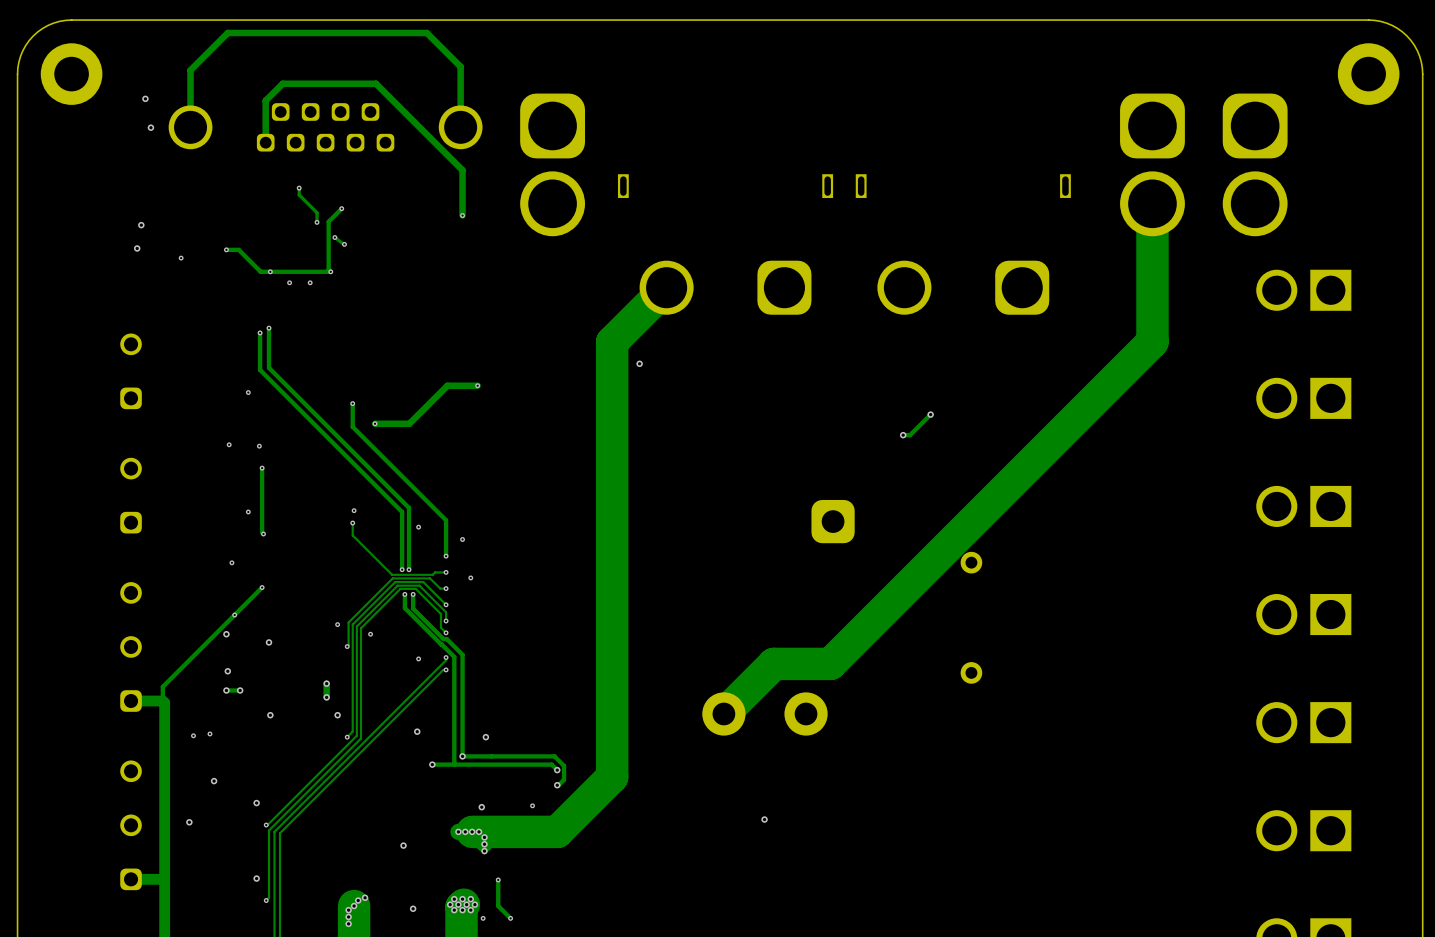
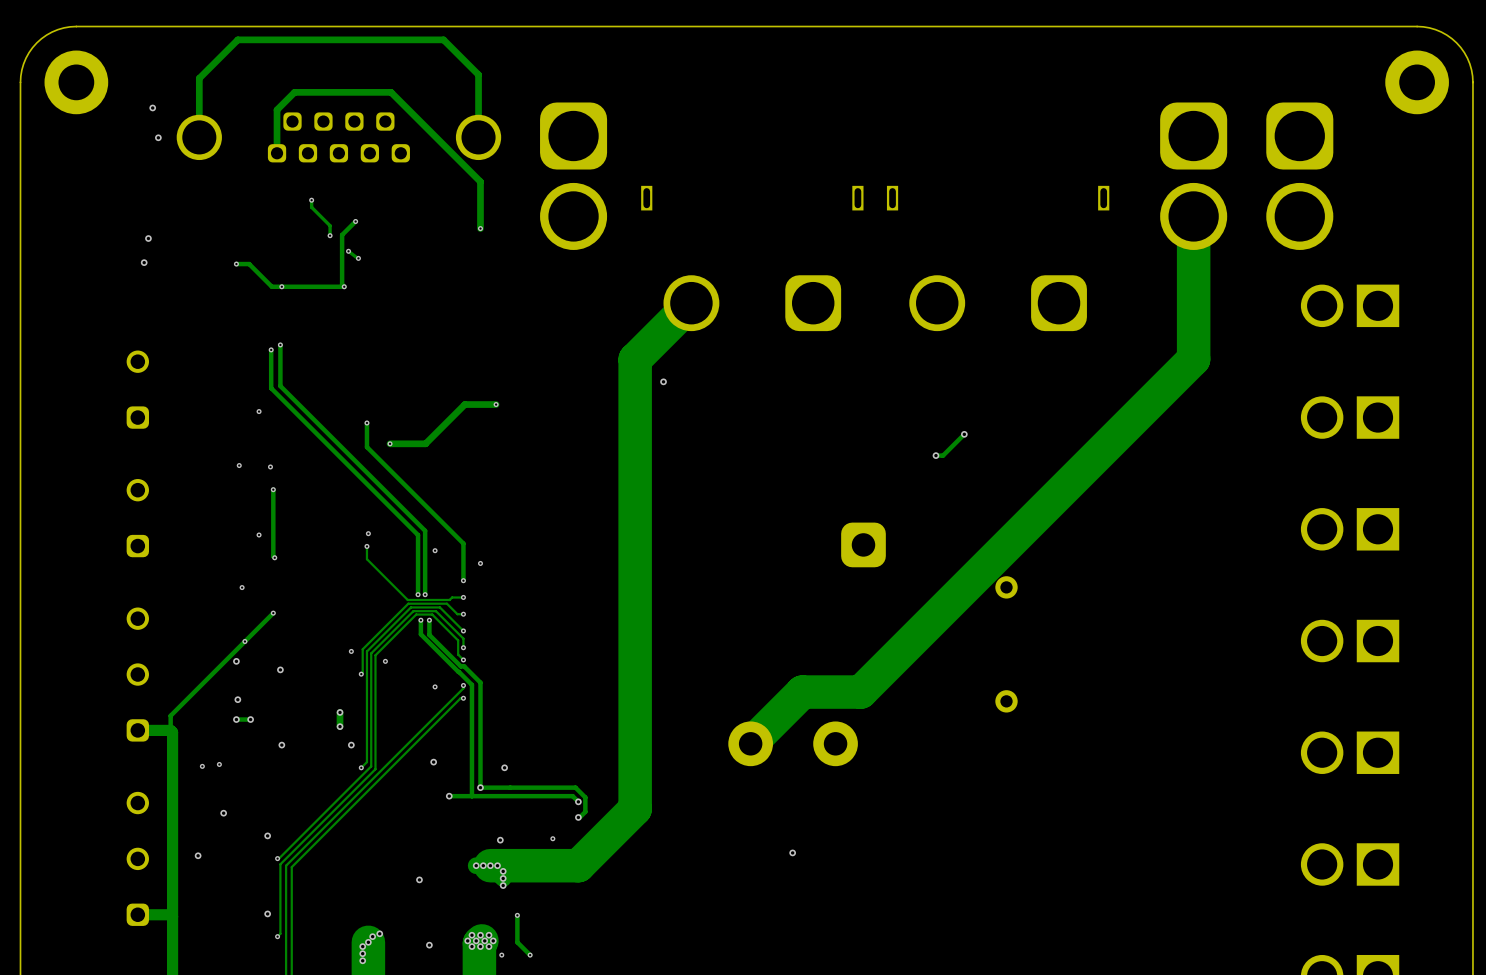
via: (181, 258) -> none
via: (289, 282) -> none
via: (310, 282) -> none
via: (470, 577) -> none

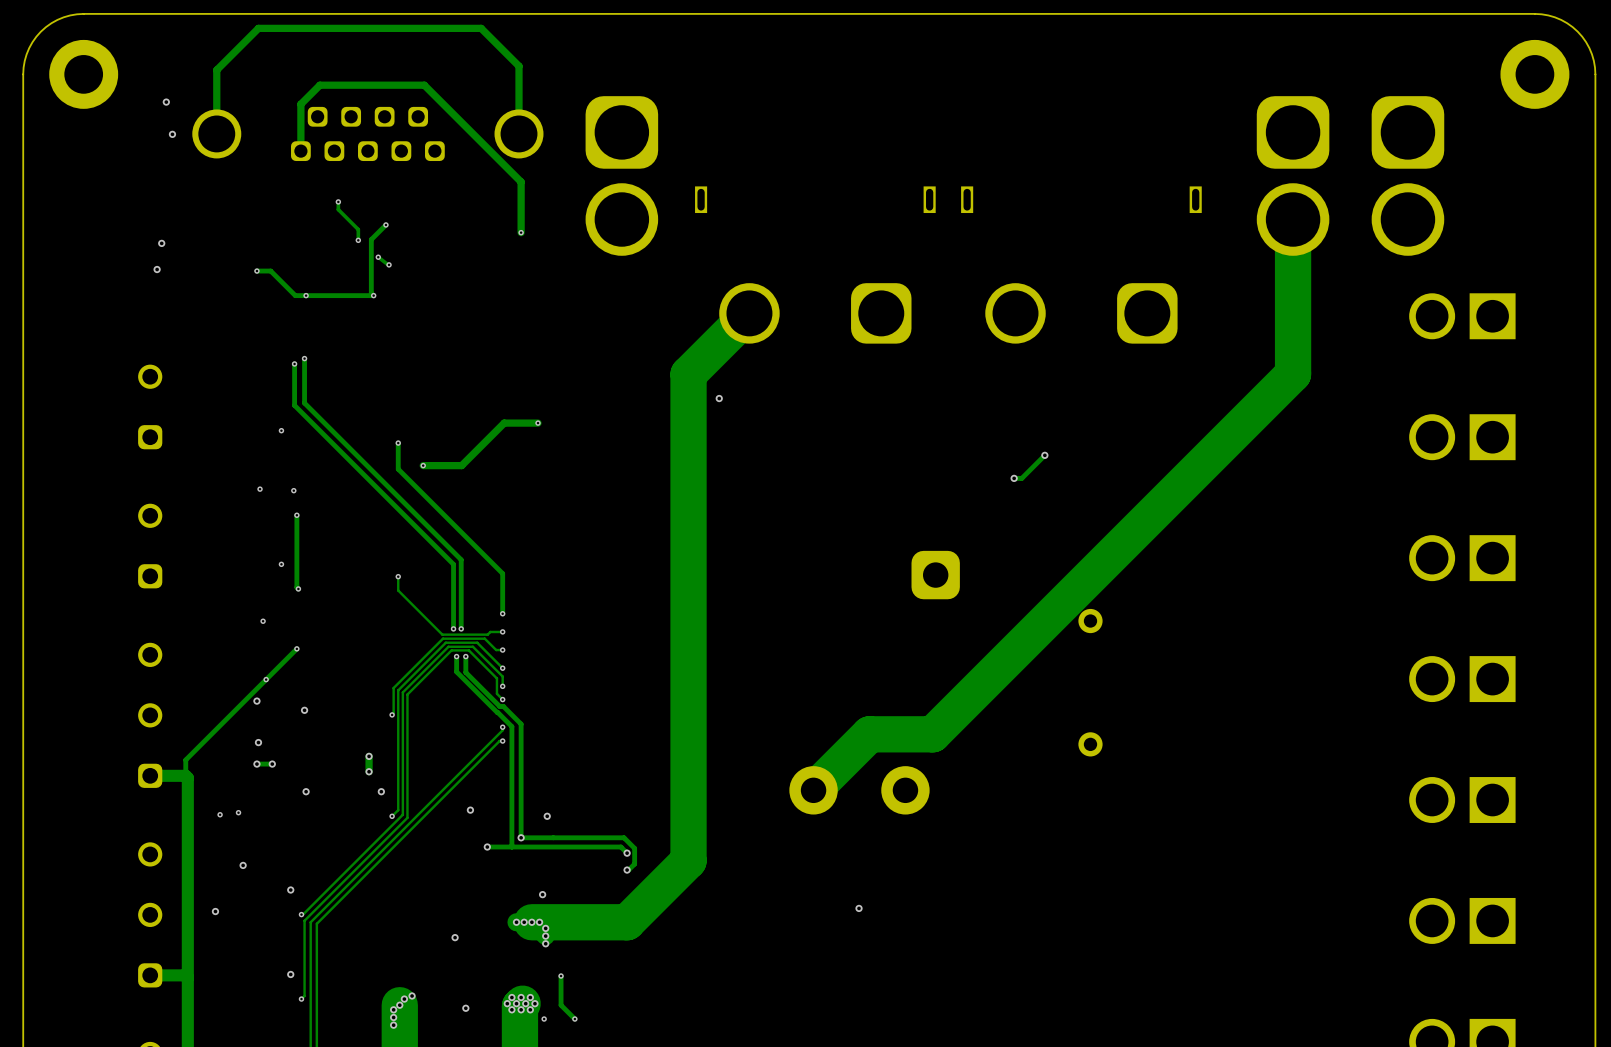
via: (368, 533) -> none
via: (435, 550) -> none
via: (480, 563) -> none
via: (351, 651) -> none
via: (385, 661) -> none
via: (435, 686) -> none
via: (552, 838) -> none

